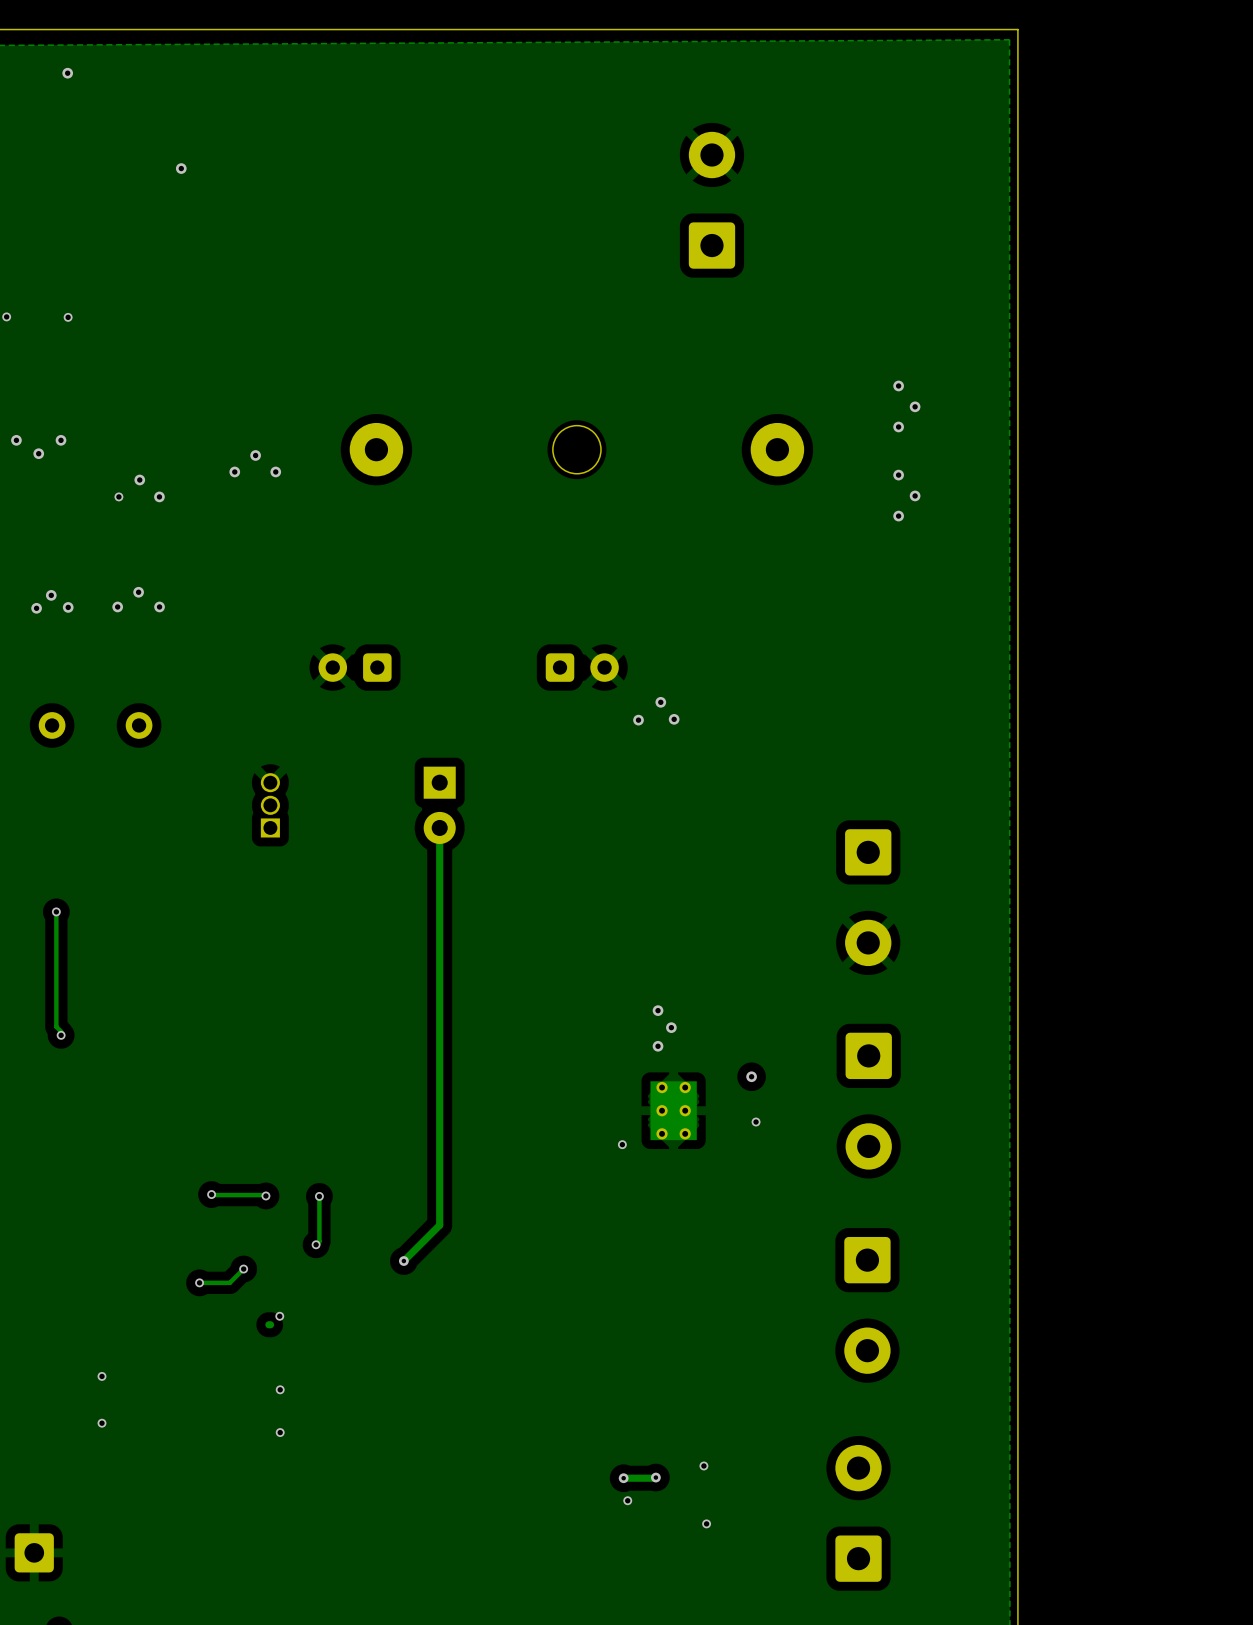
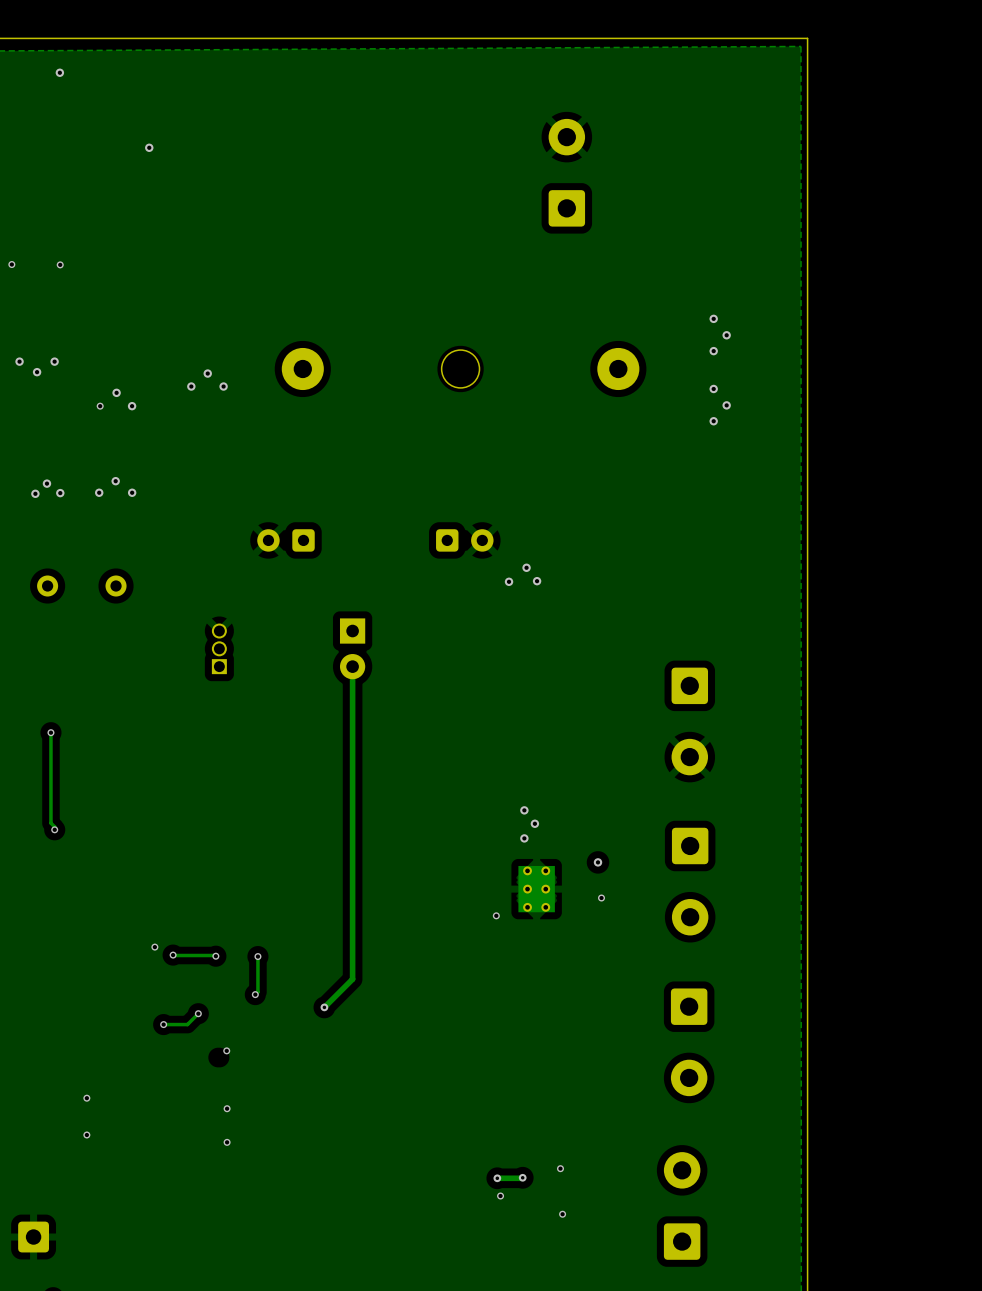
via: none -> (154, 947)
track: (270, 1324) (268, 1324) -> none

